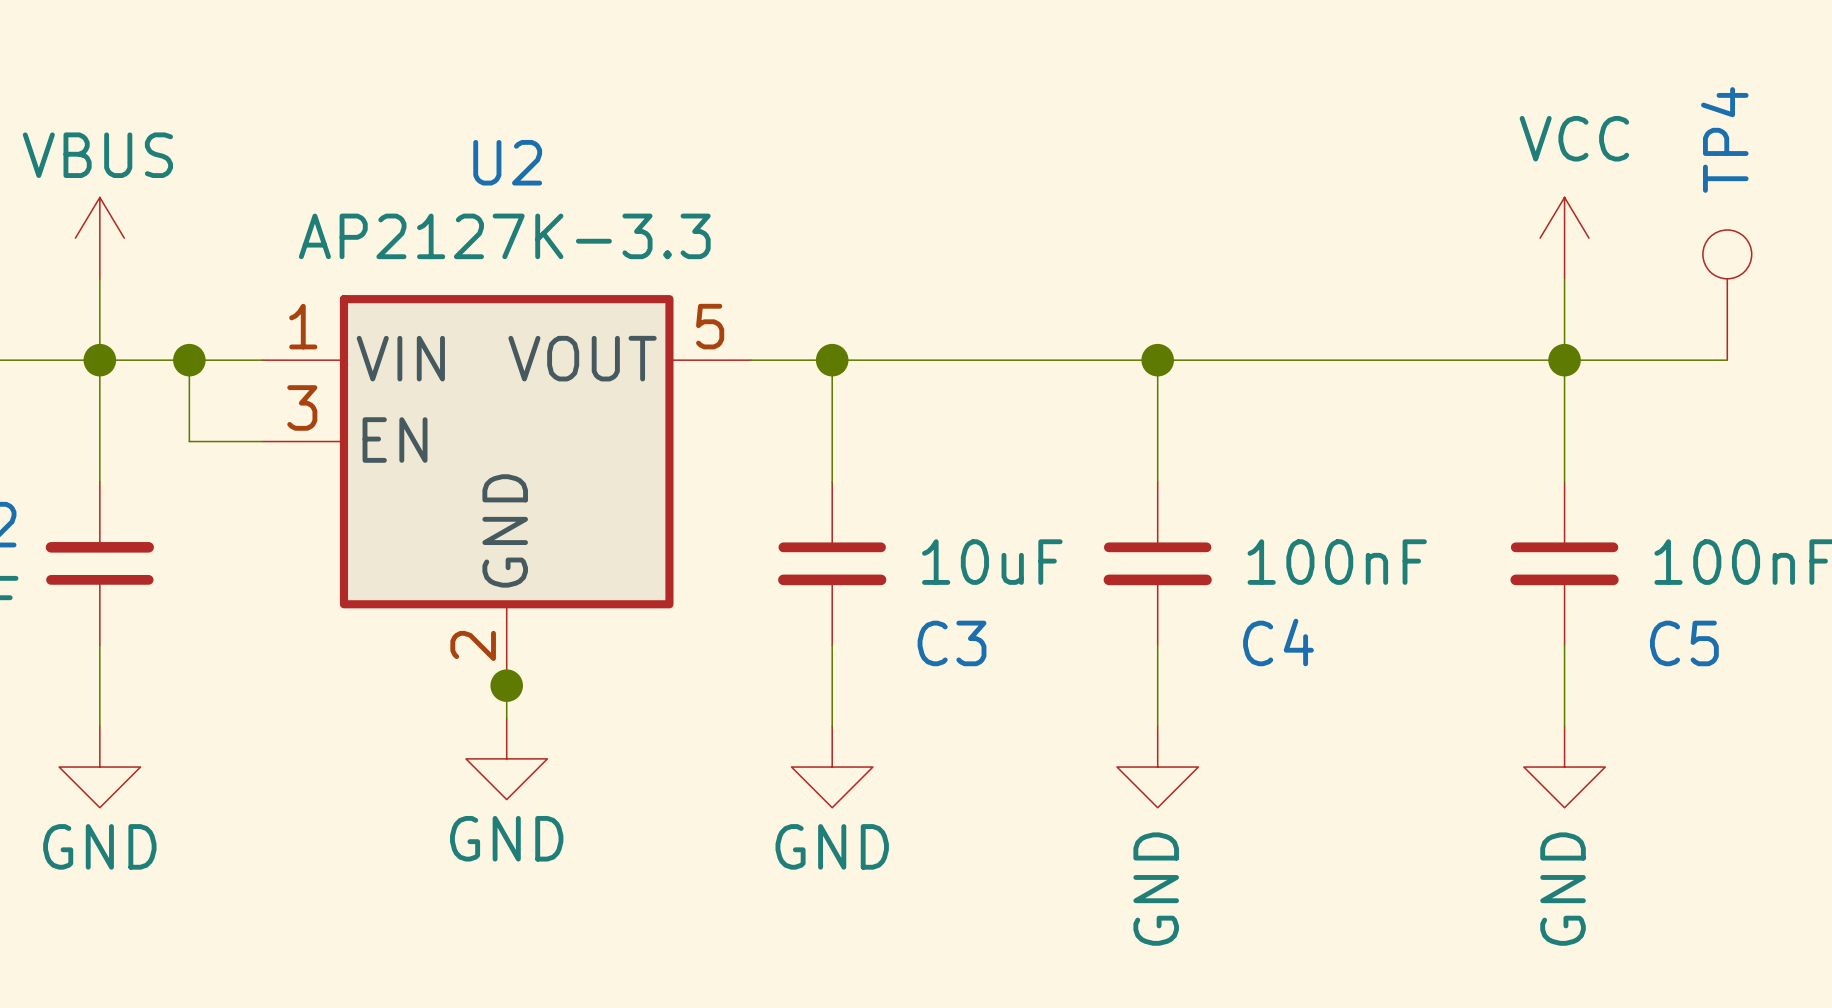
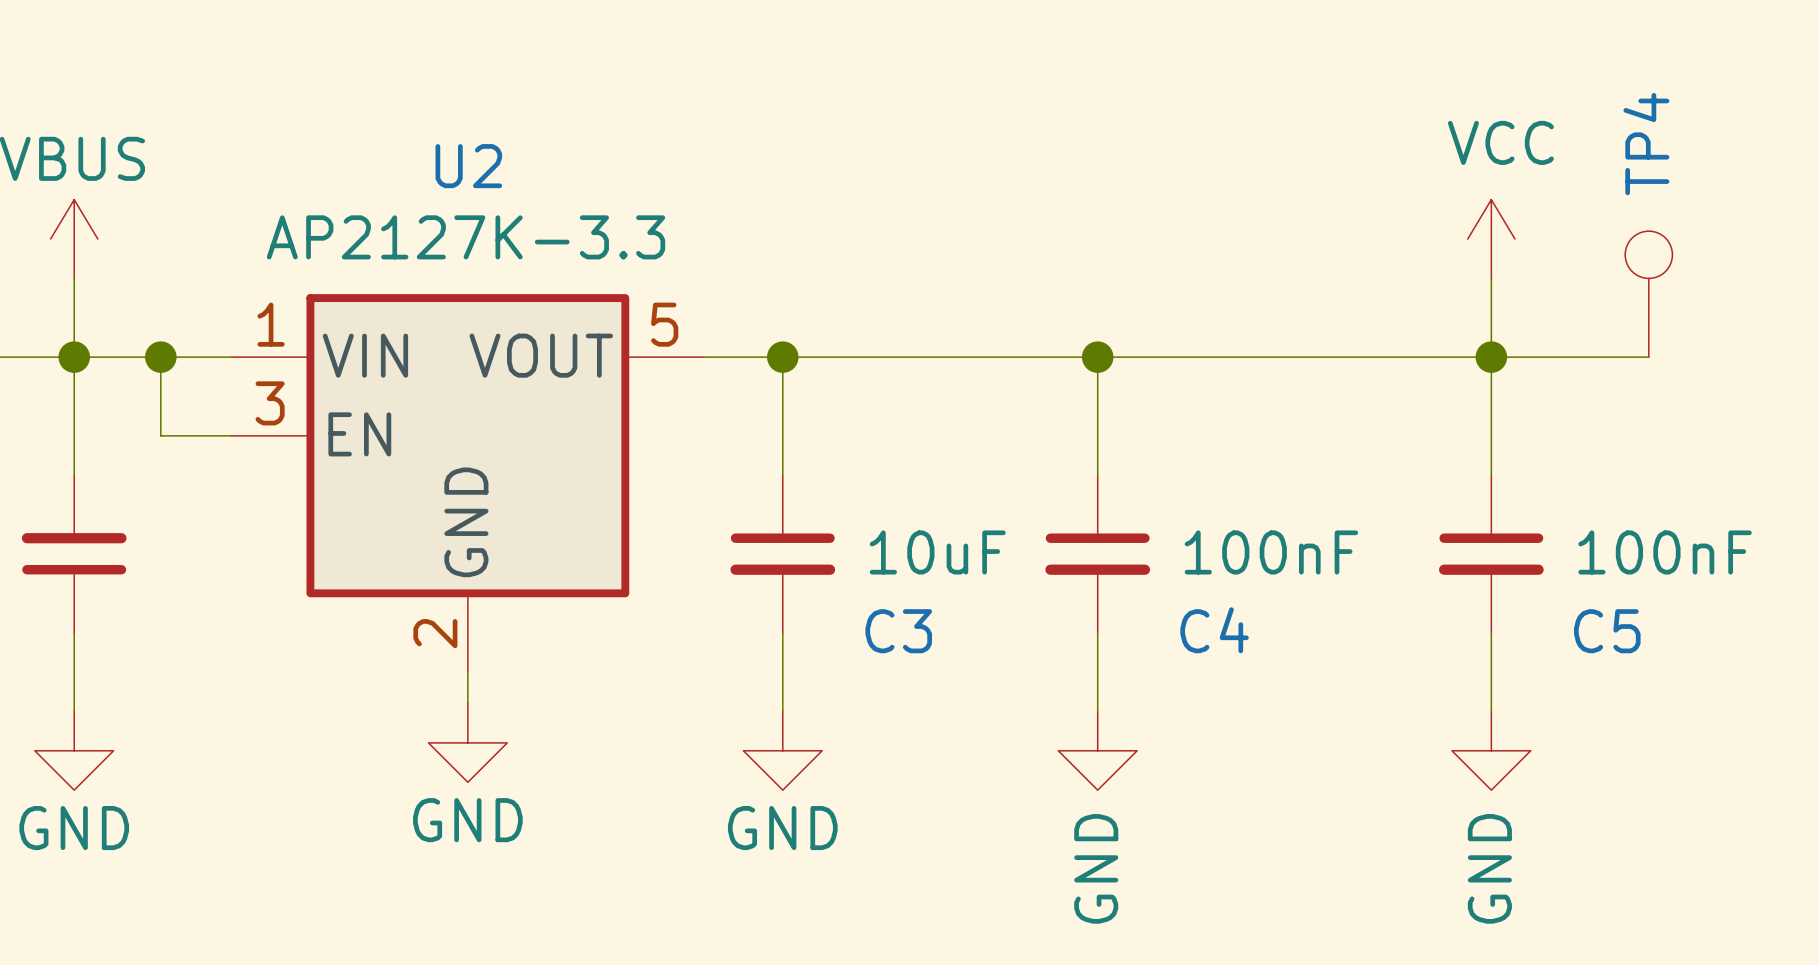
junction: (506, 685) -> none

